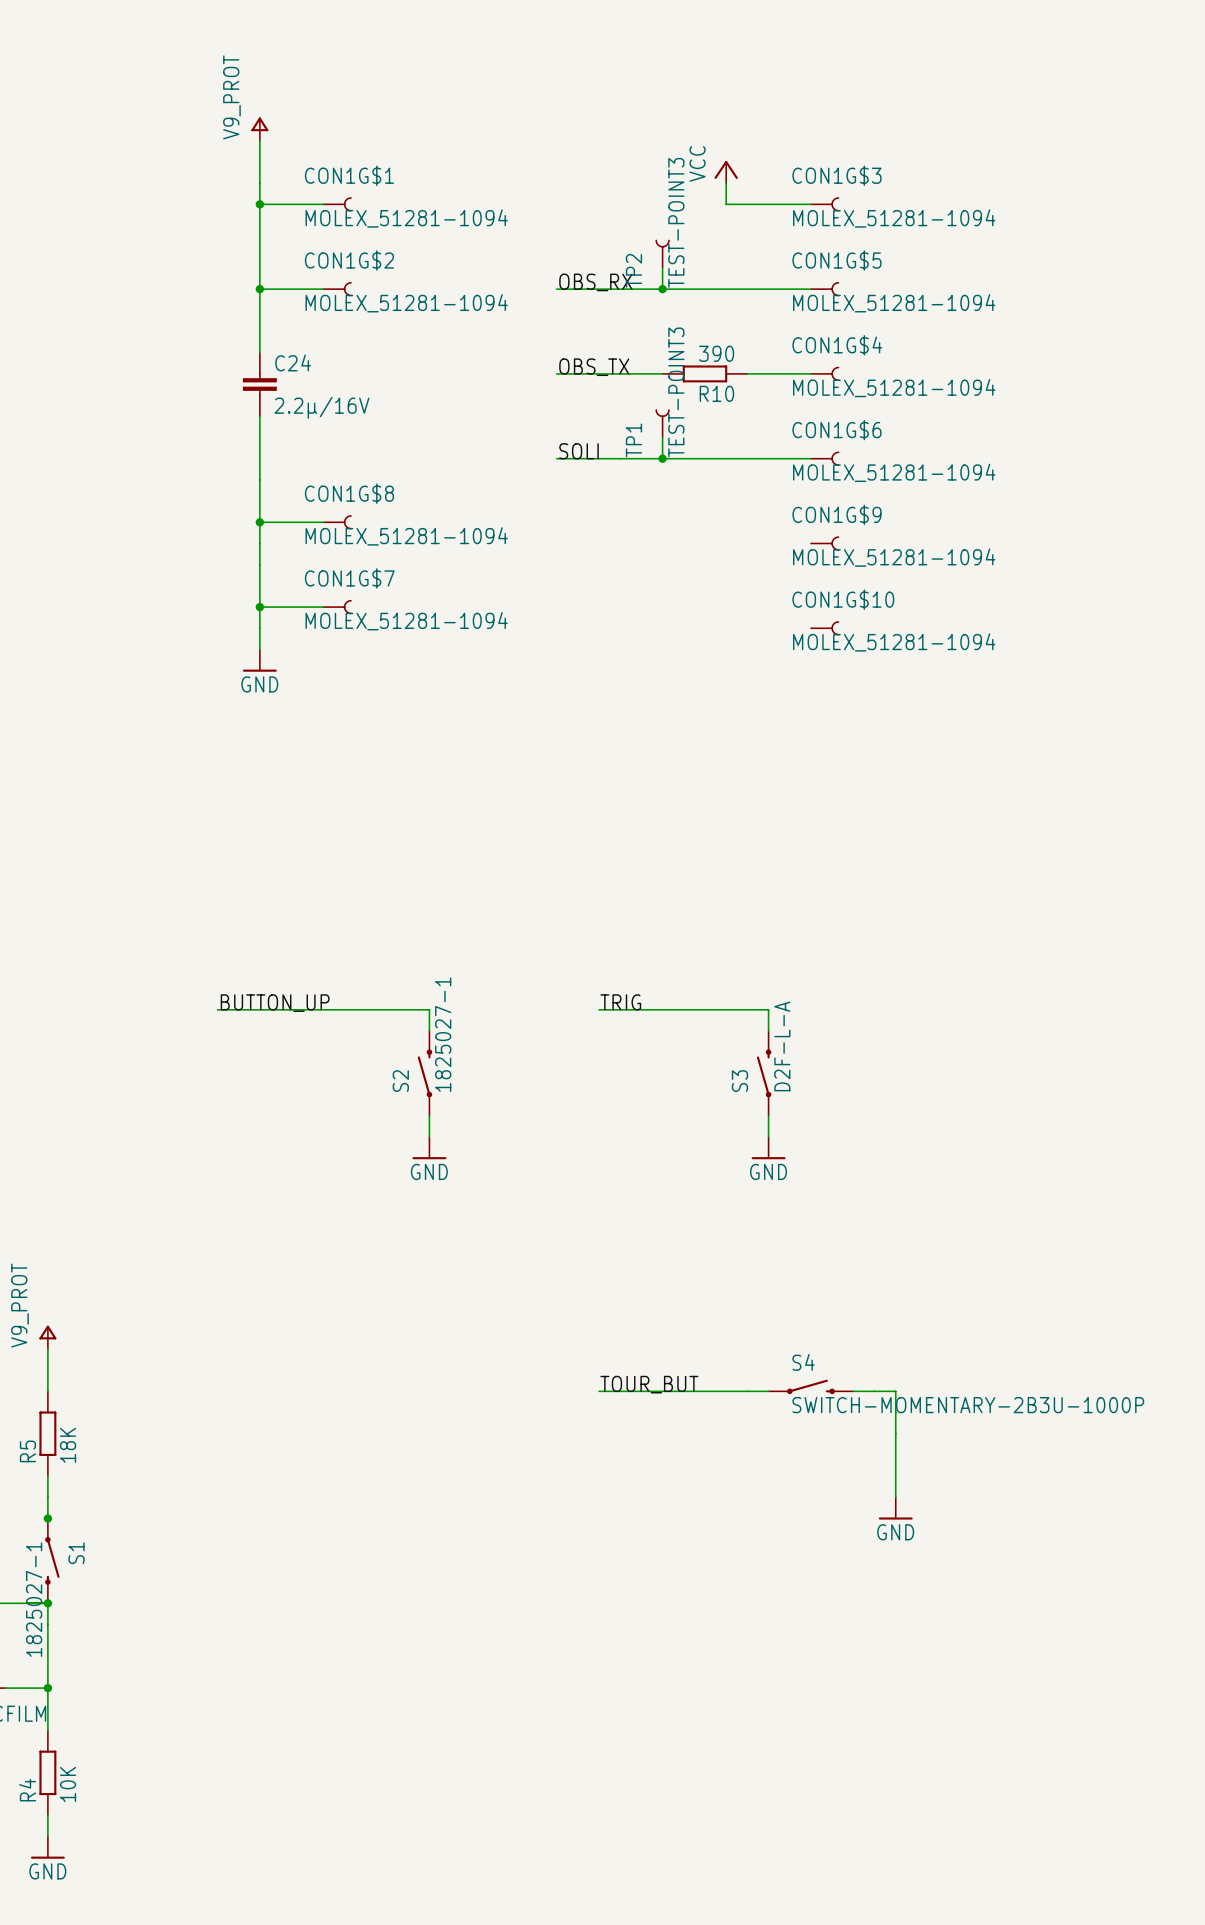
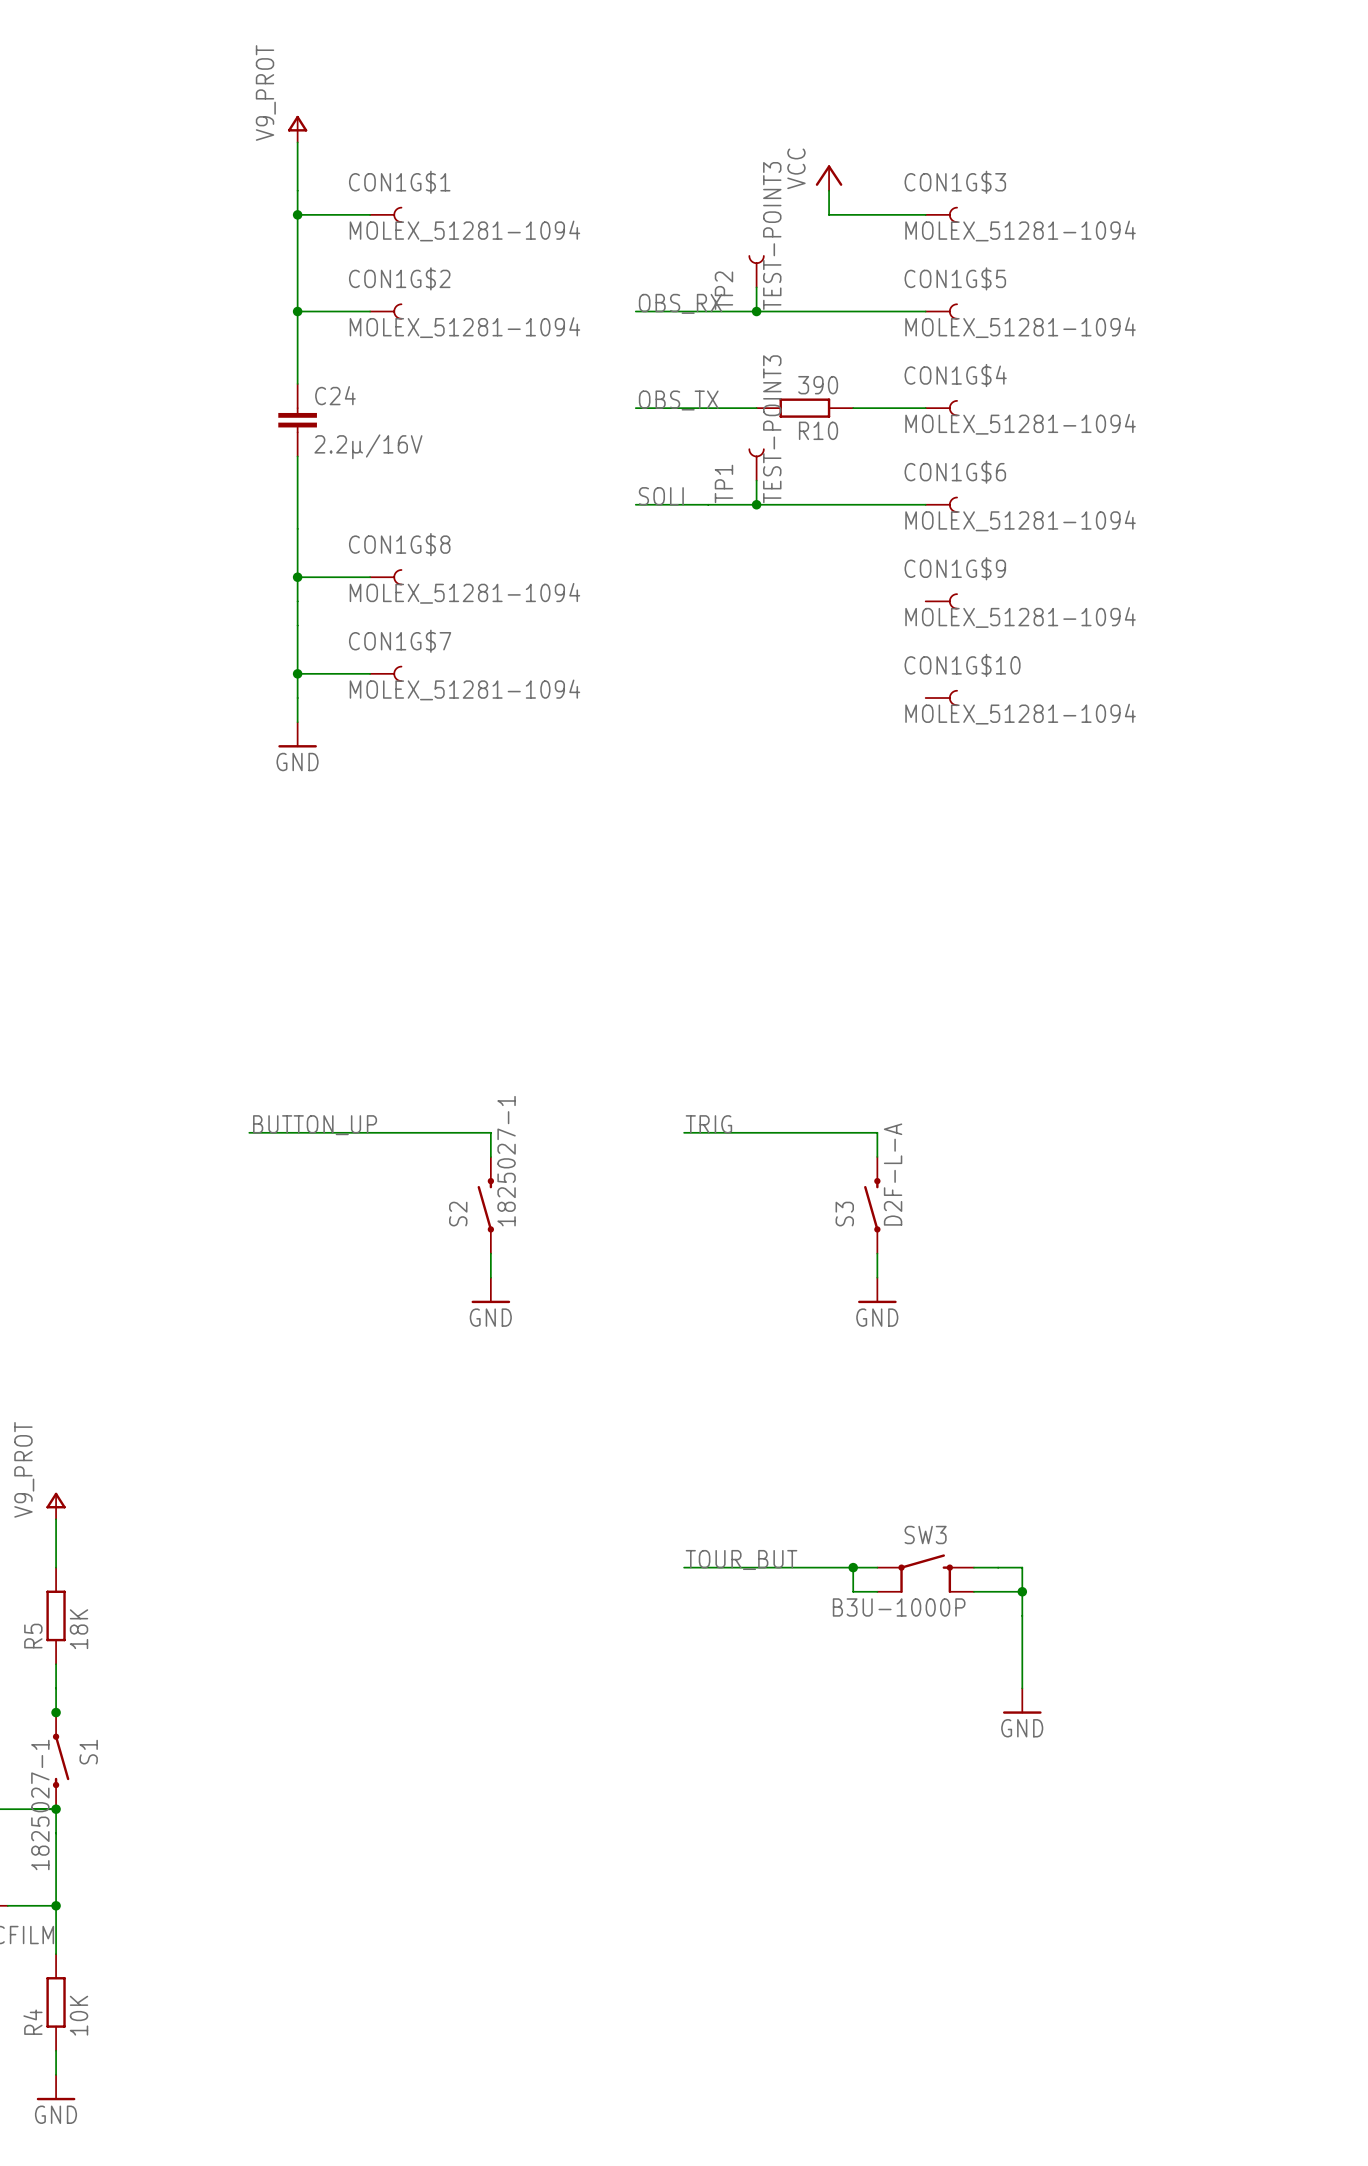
S4: SWITCH-MOMENTARY-2B3U-1000P (810, 1386) -> none
wire: none -> (853, 1567) (853, 1591) (877, 1591)
junction: none -> (853, 1567)
SW3: none -> B3U-1000P (925, 1573)
wire: none -> (973, 1591) (1022, 1591)
junction: none -> (1022, 1591)

